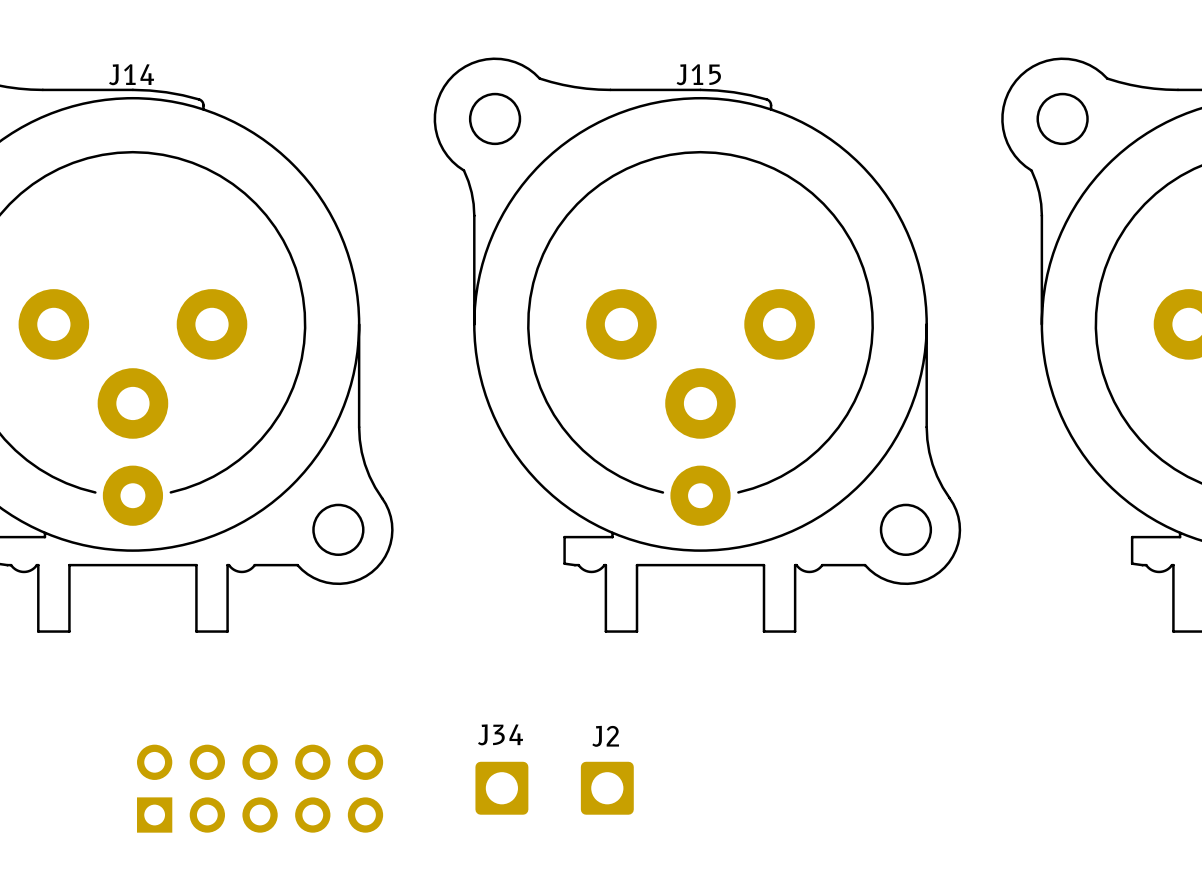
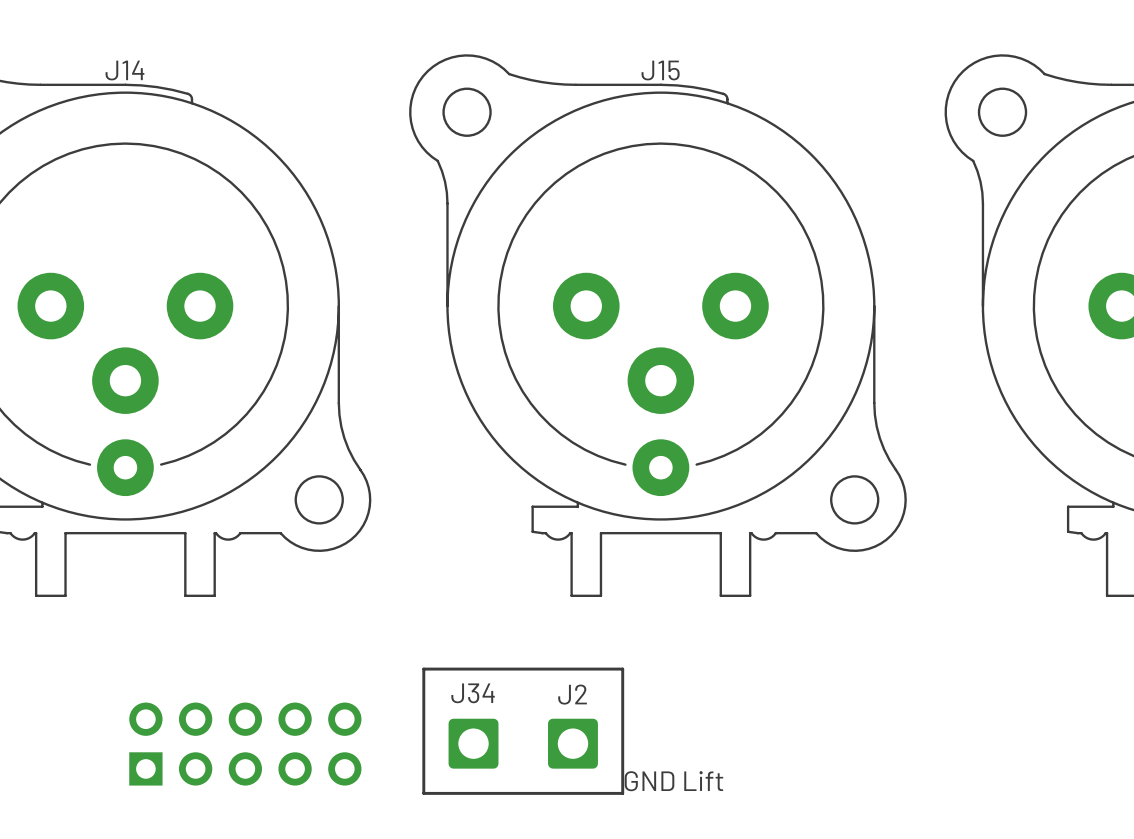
line: none -> (423, 669) (622, 669) (622, 793) (423, 793) (423, 669)
text: none -> GND Lift (673, 781)

